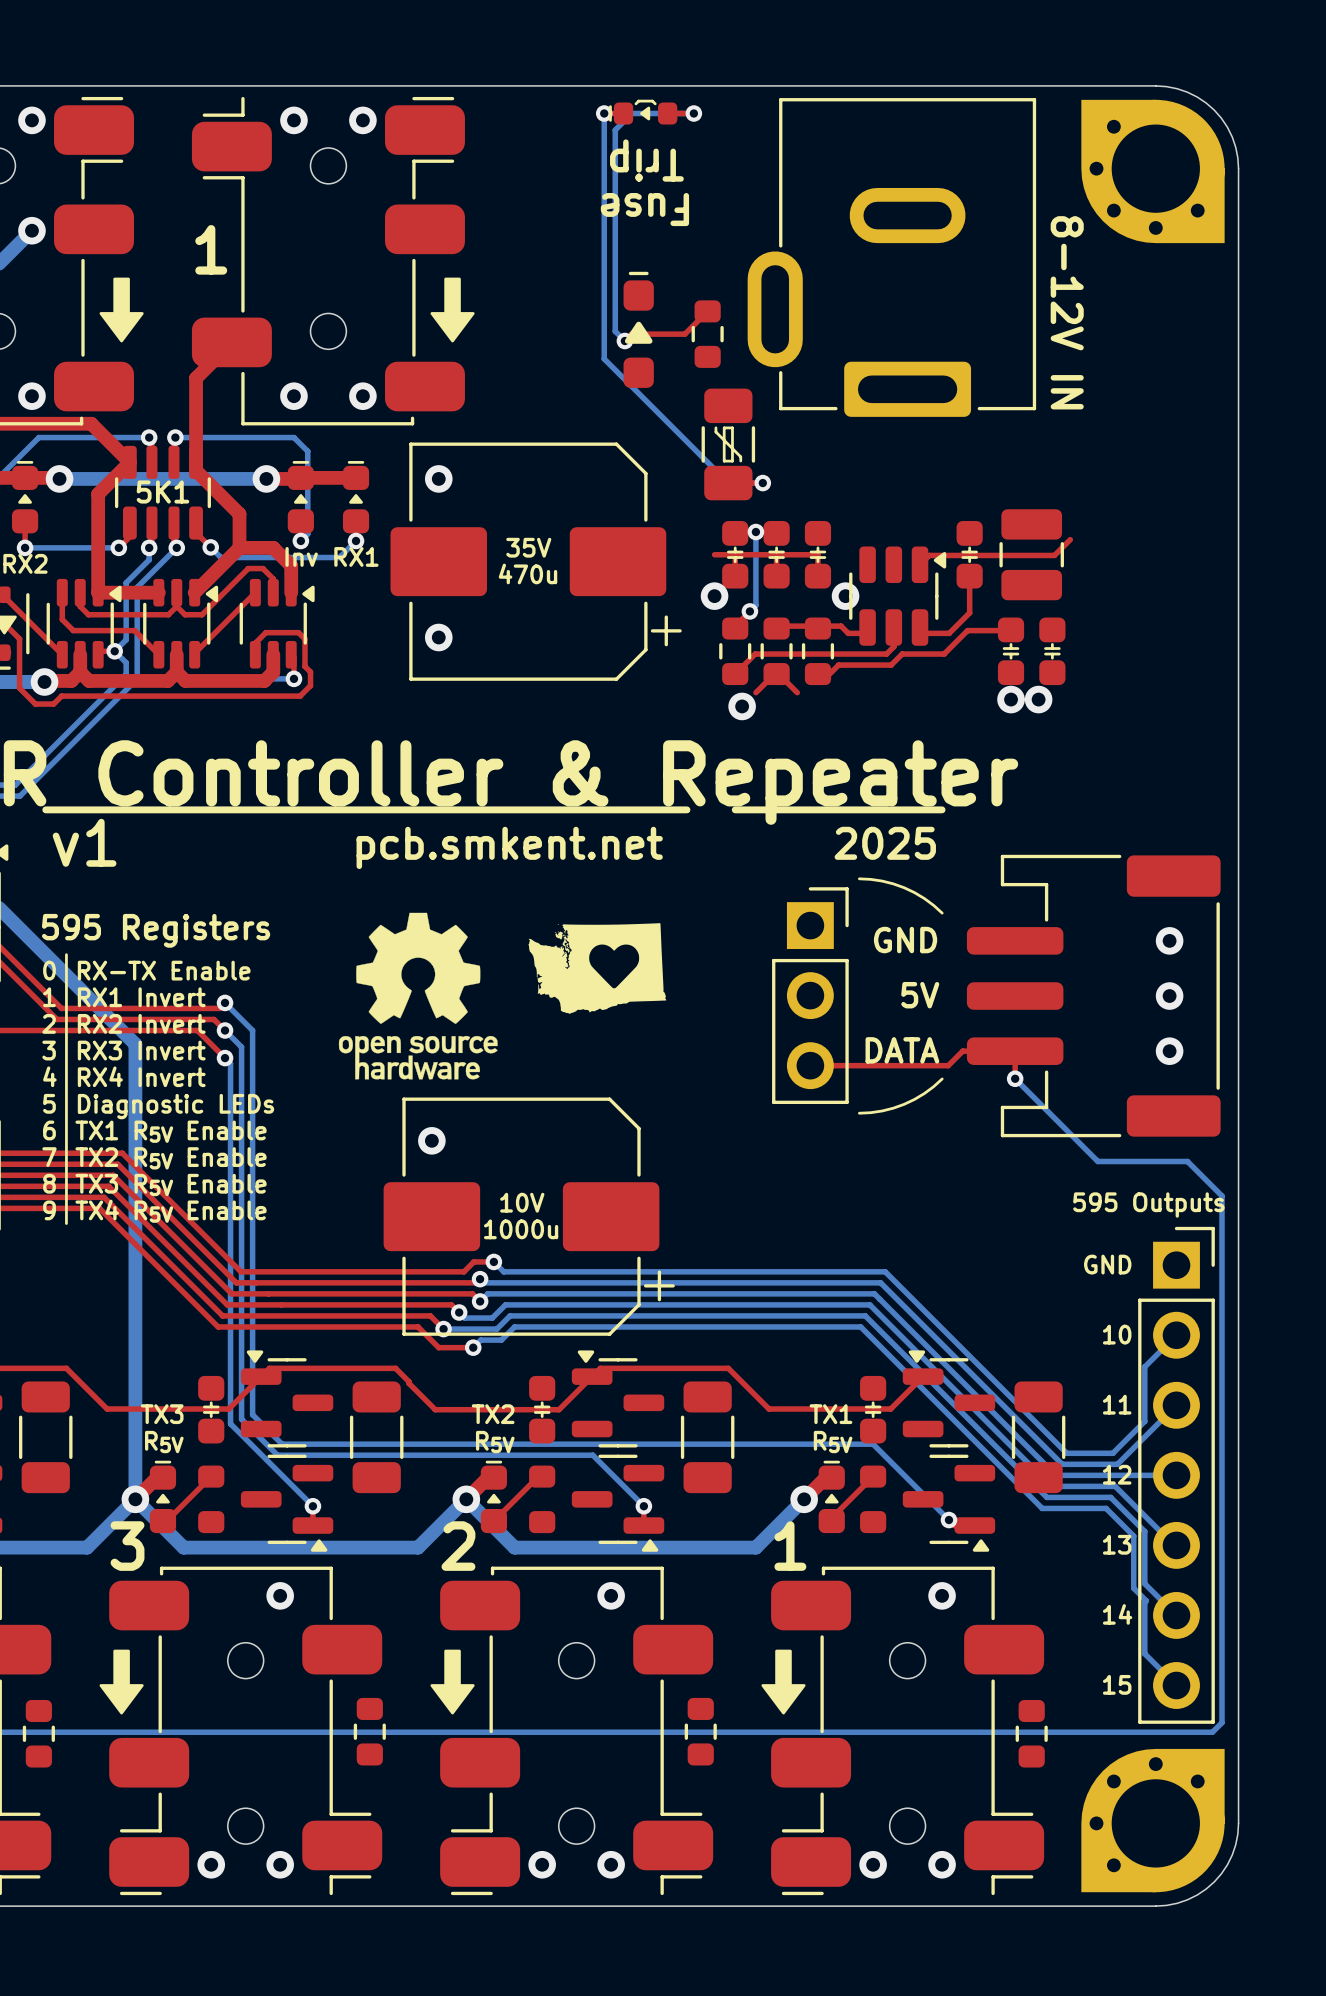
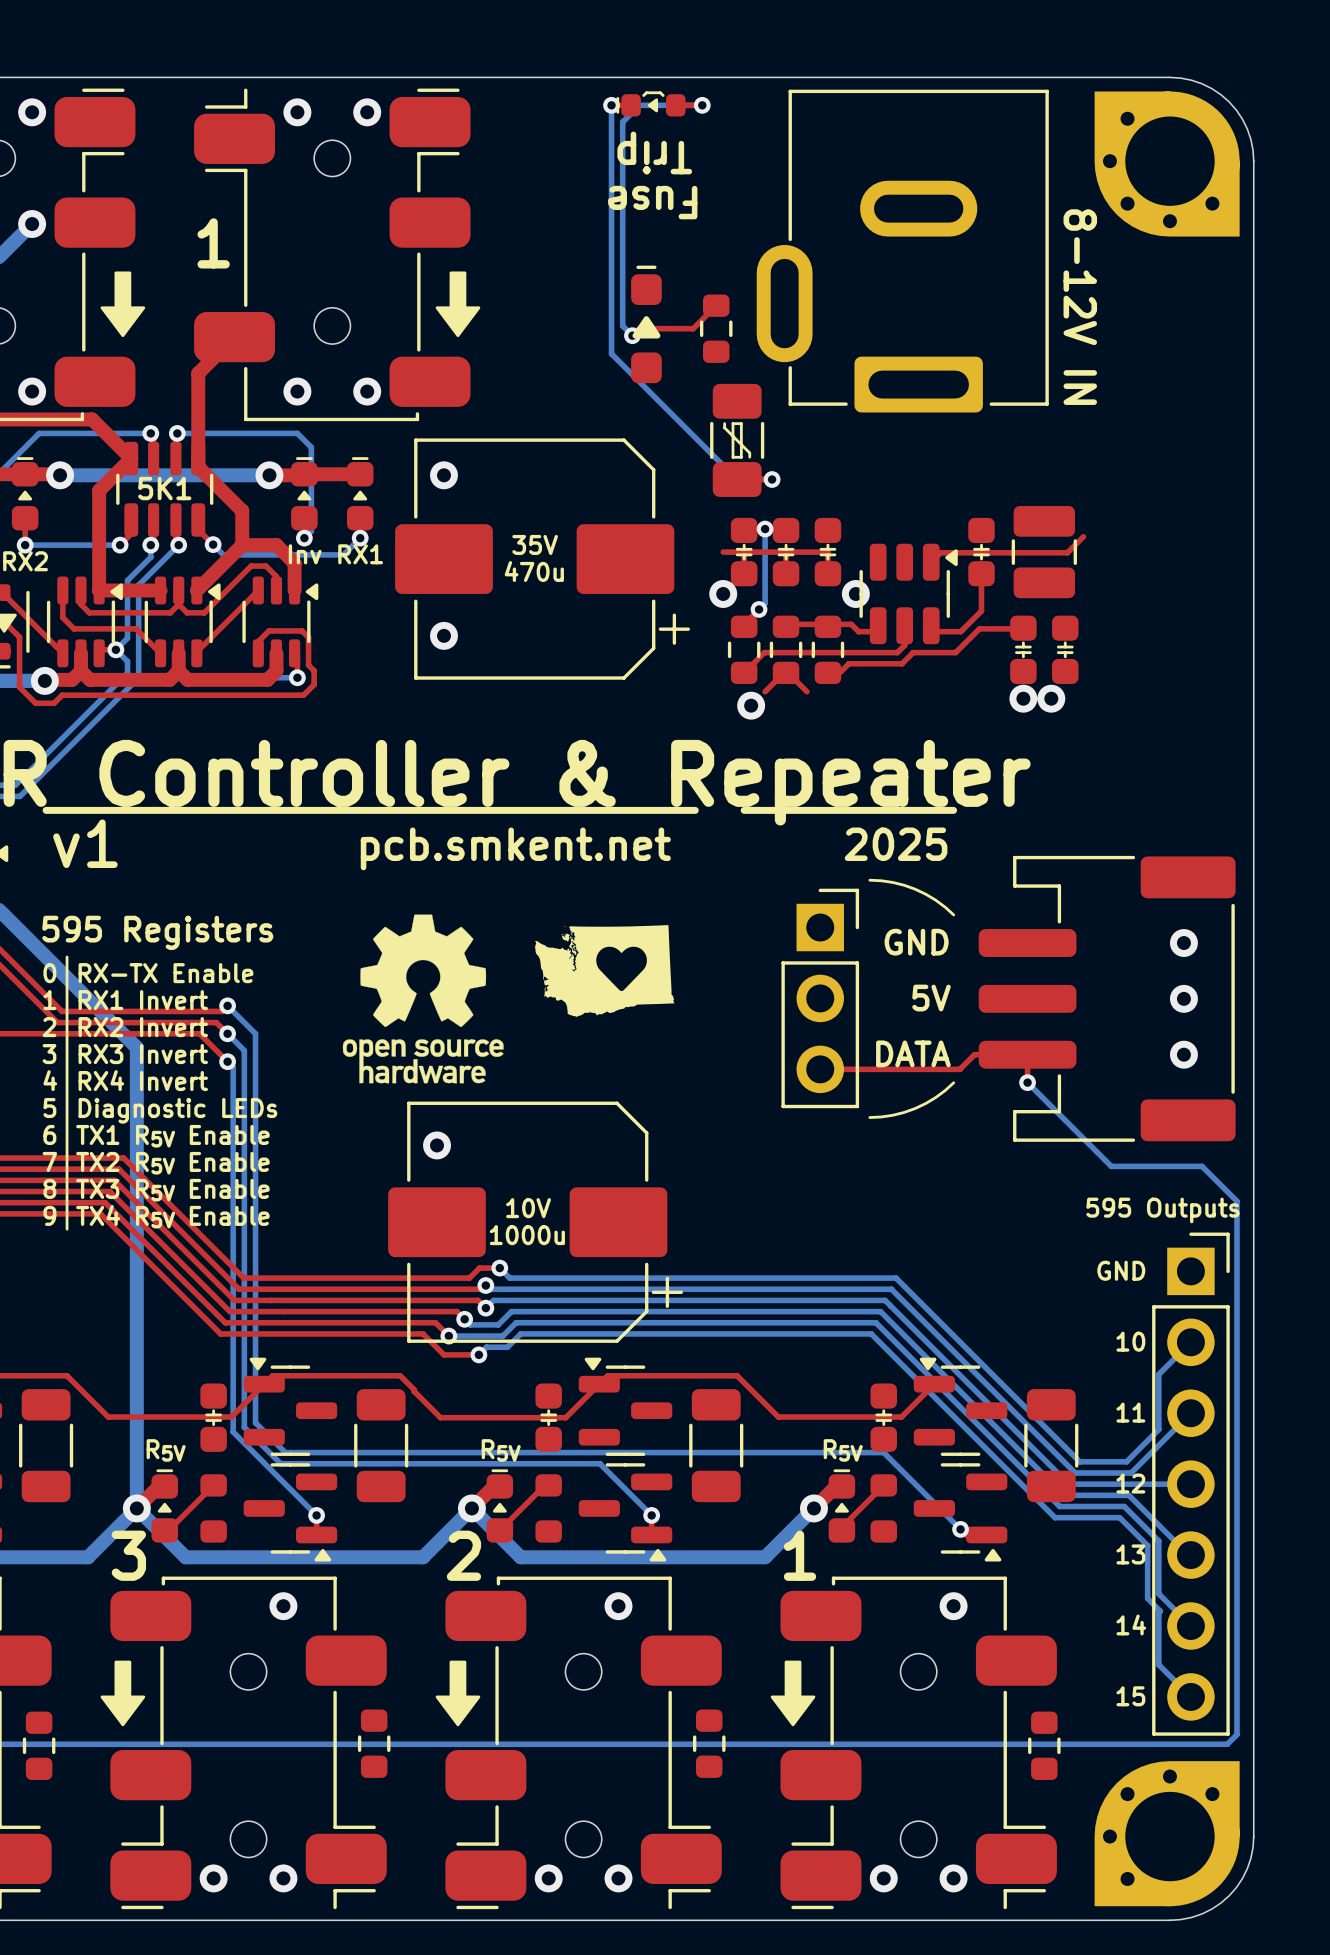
text: TX3 (162, 1414) -> none
text: TX2 (493, 1414) -> none
text: TX1 (830, 1414) -> none

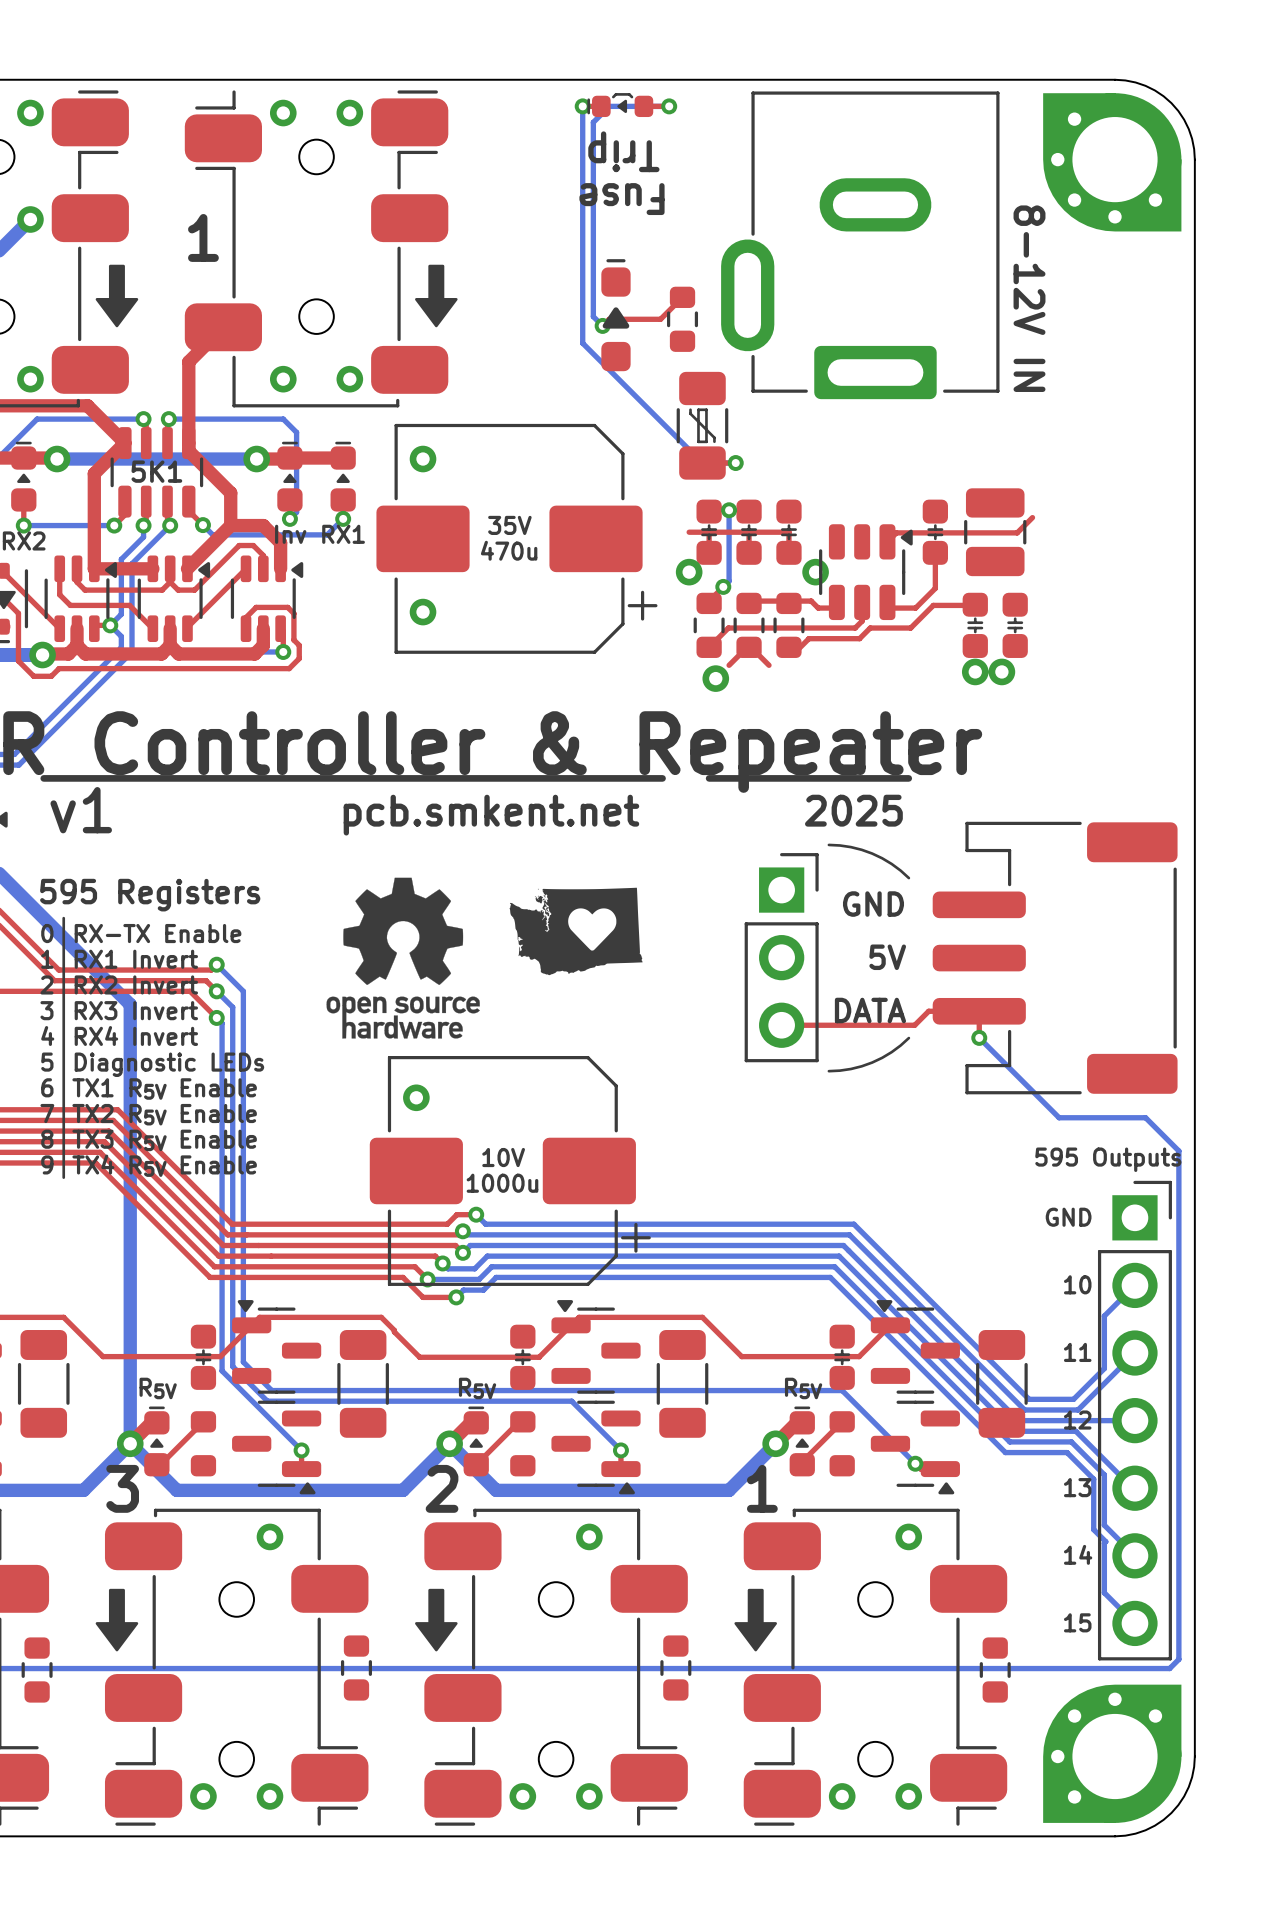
via: (1183, 943) -> none
via: (1183, 998) -> none
via: (1183, 1054) -> none

